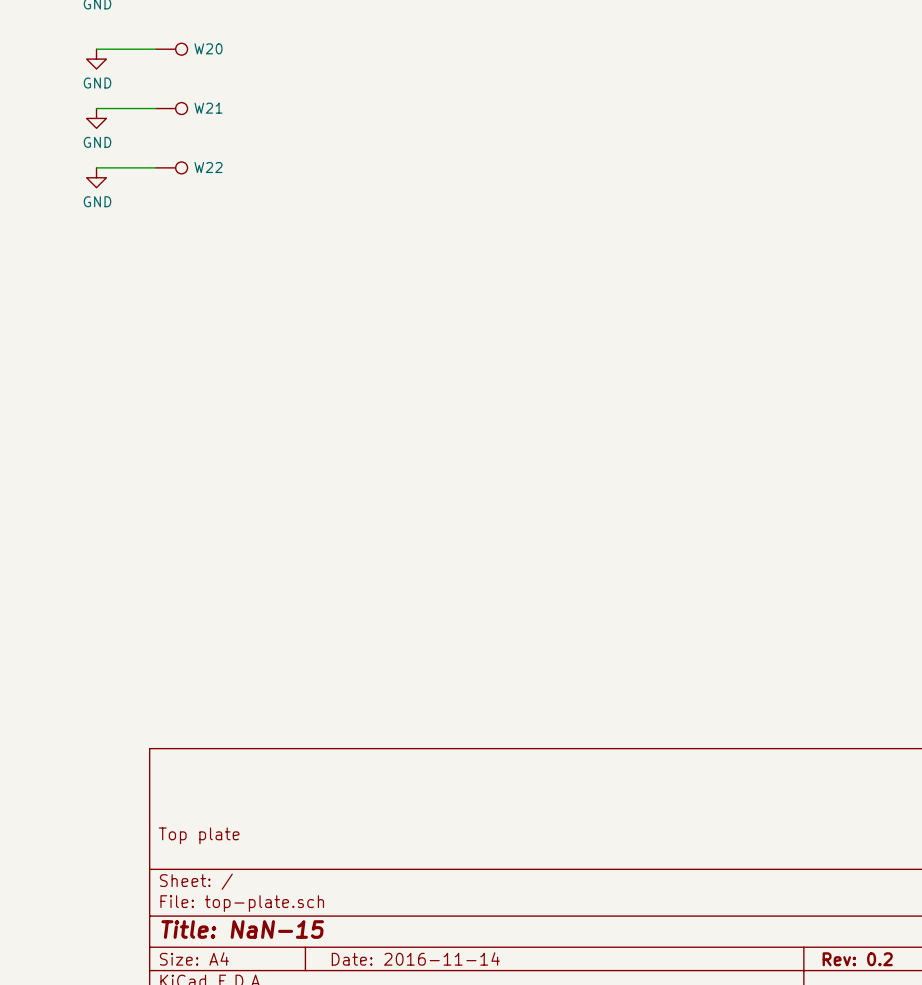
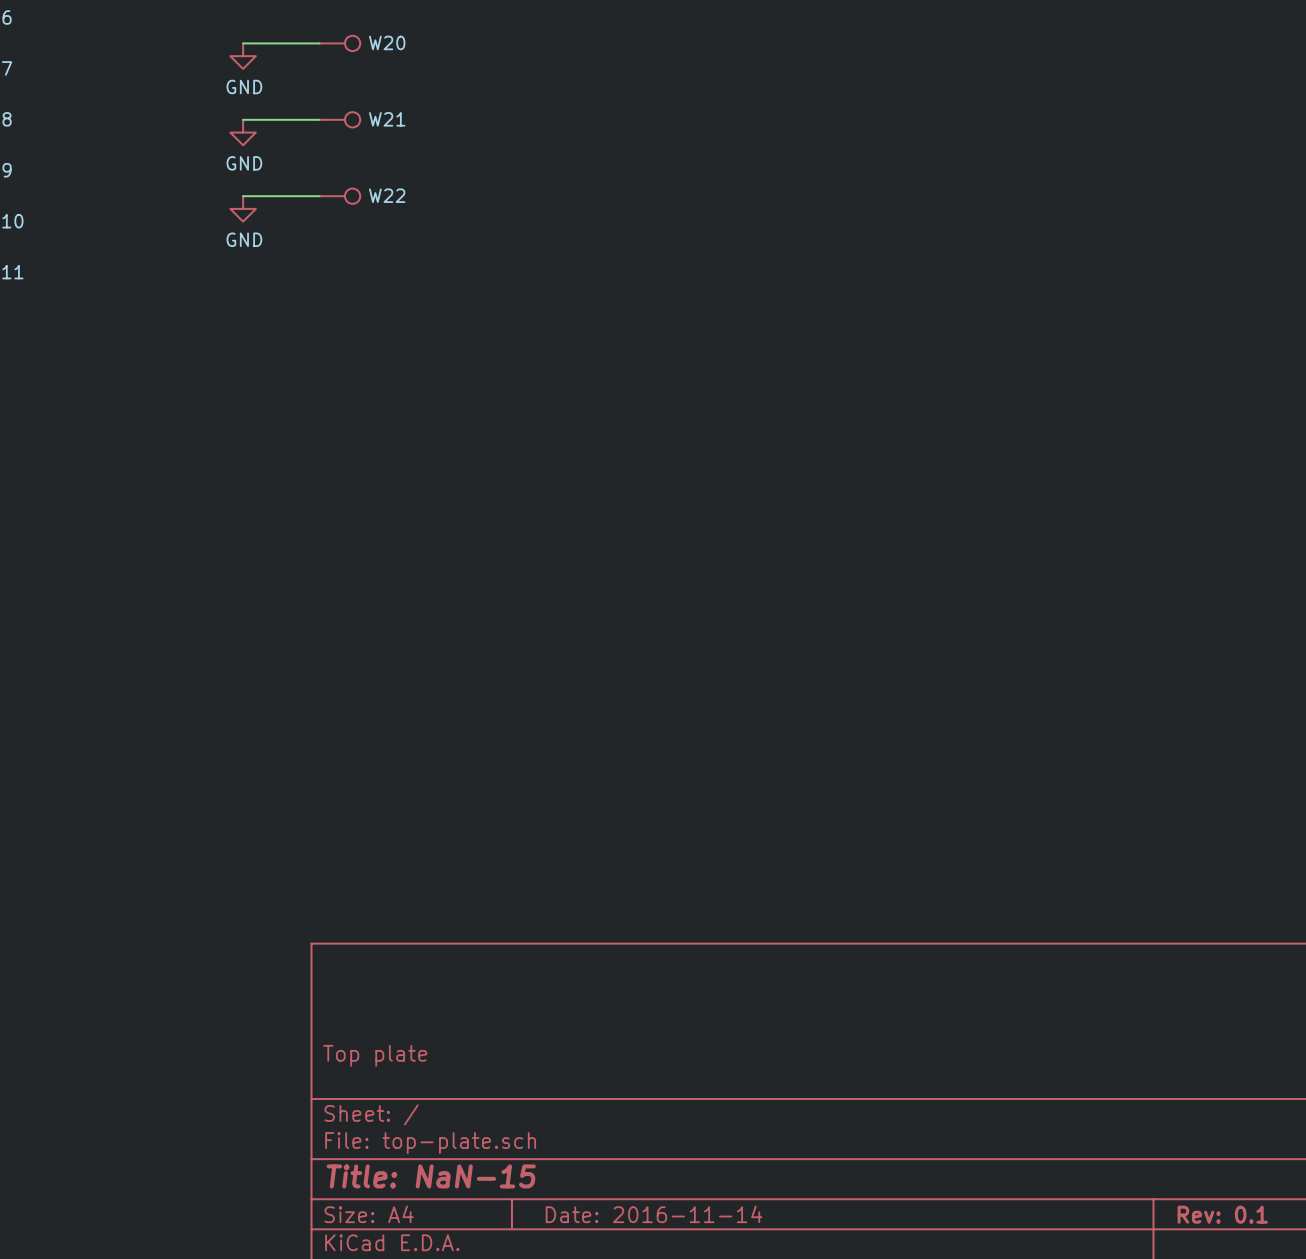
title block: Rev: 0.2 (857, 959) -> Rev: 0.1 (1222, 1214)

